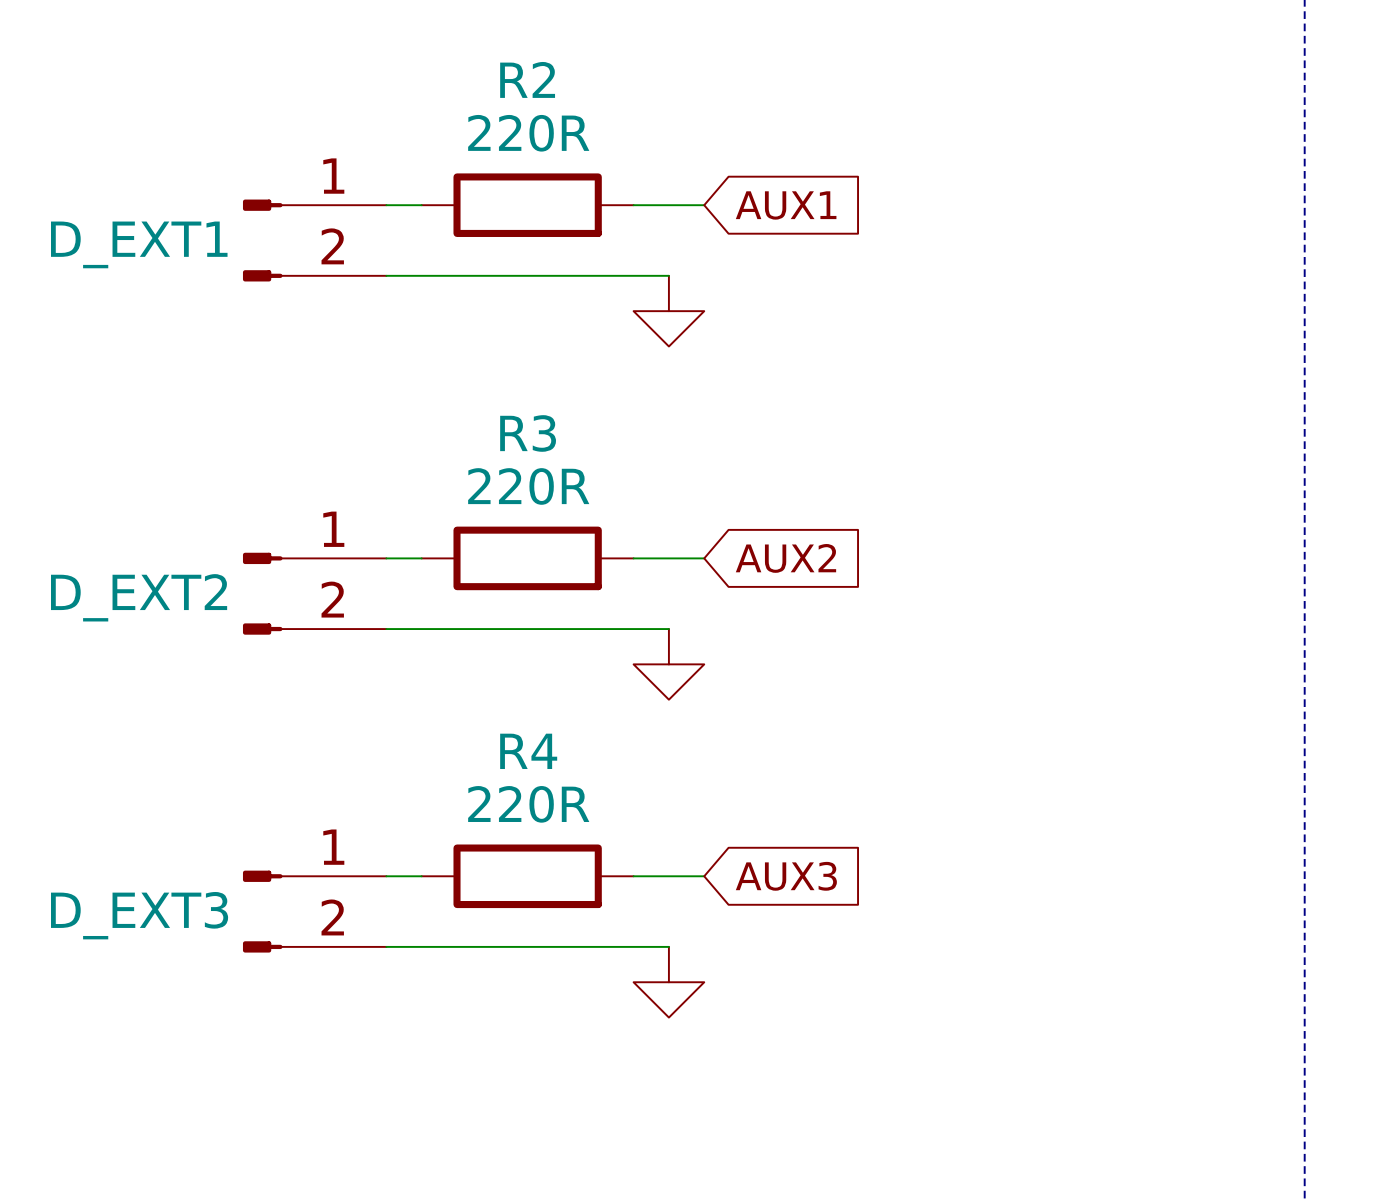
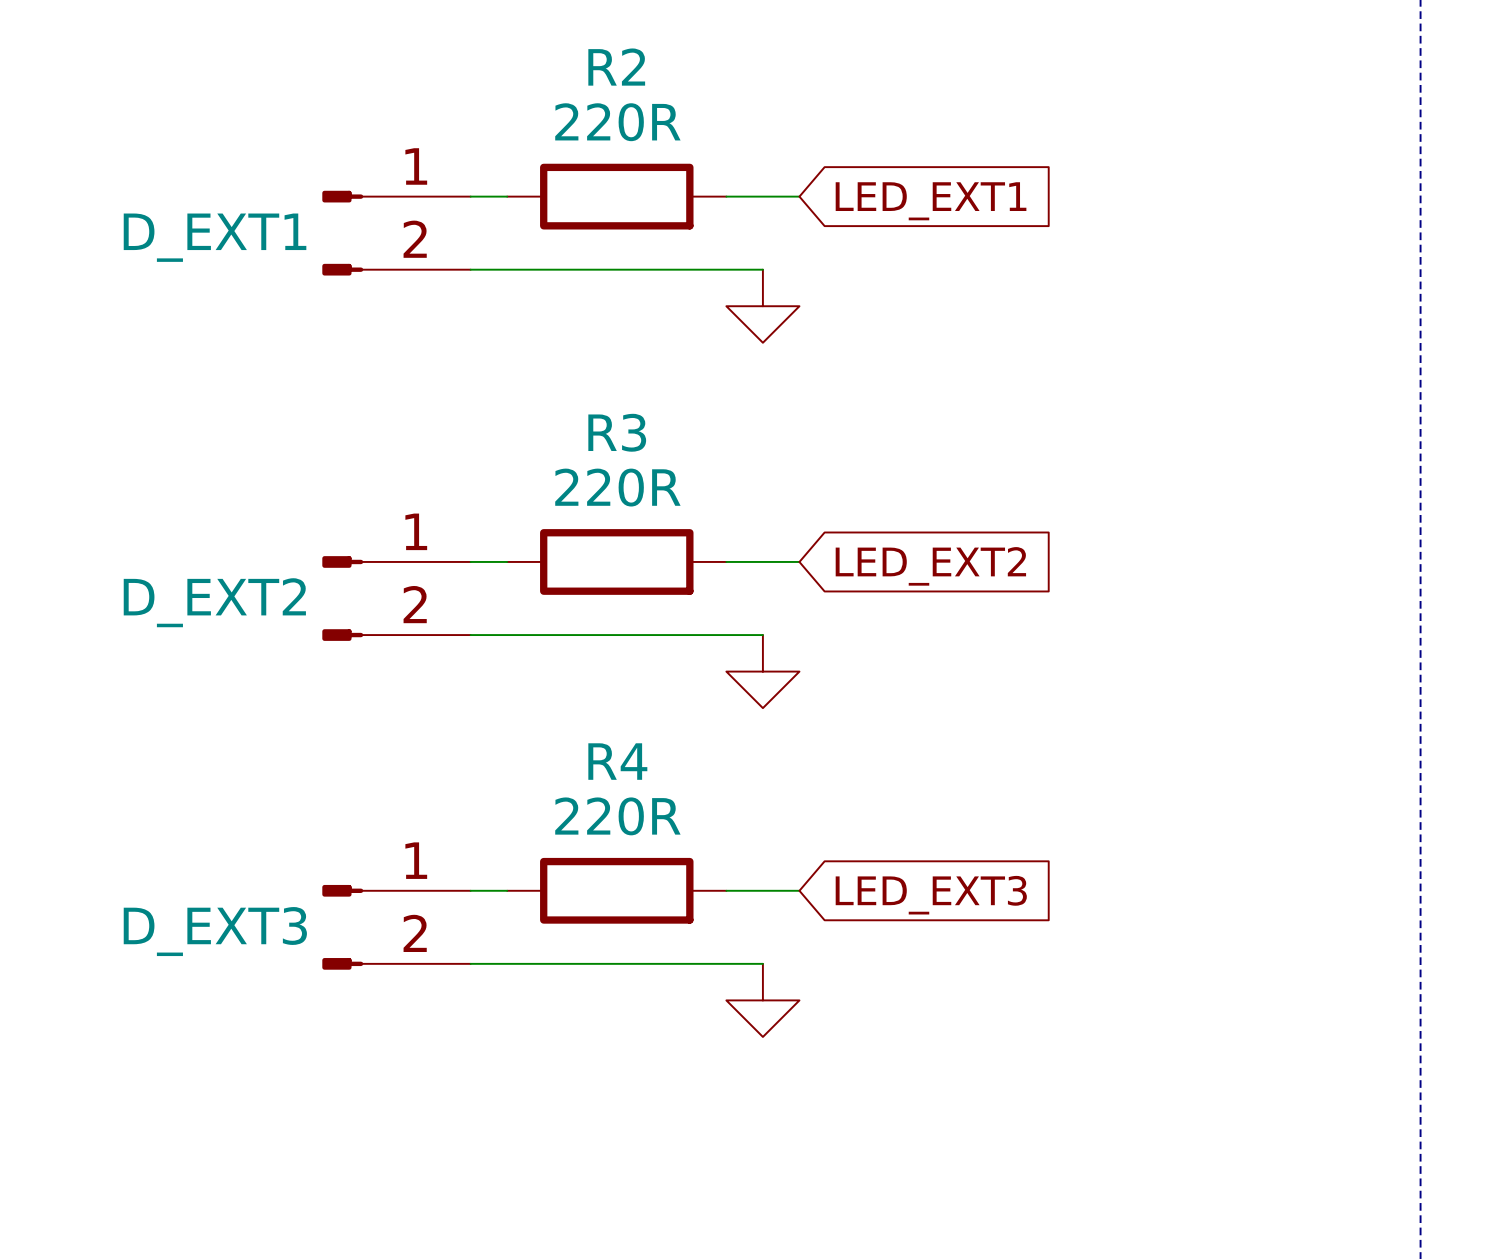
global label: AUX1 (786, 205) -> LED_EXT1 (931, 201)
global label: AUX2 (785, 558) -> LED_EXT2 (930, 566)
global label: AUX3 (786, 876) -> LED_EXT3 (931, 895)

